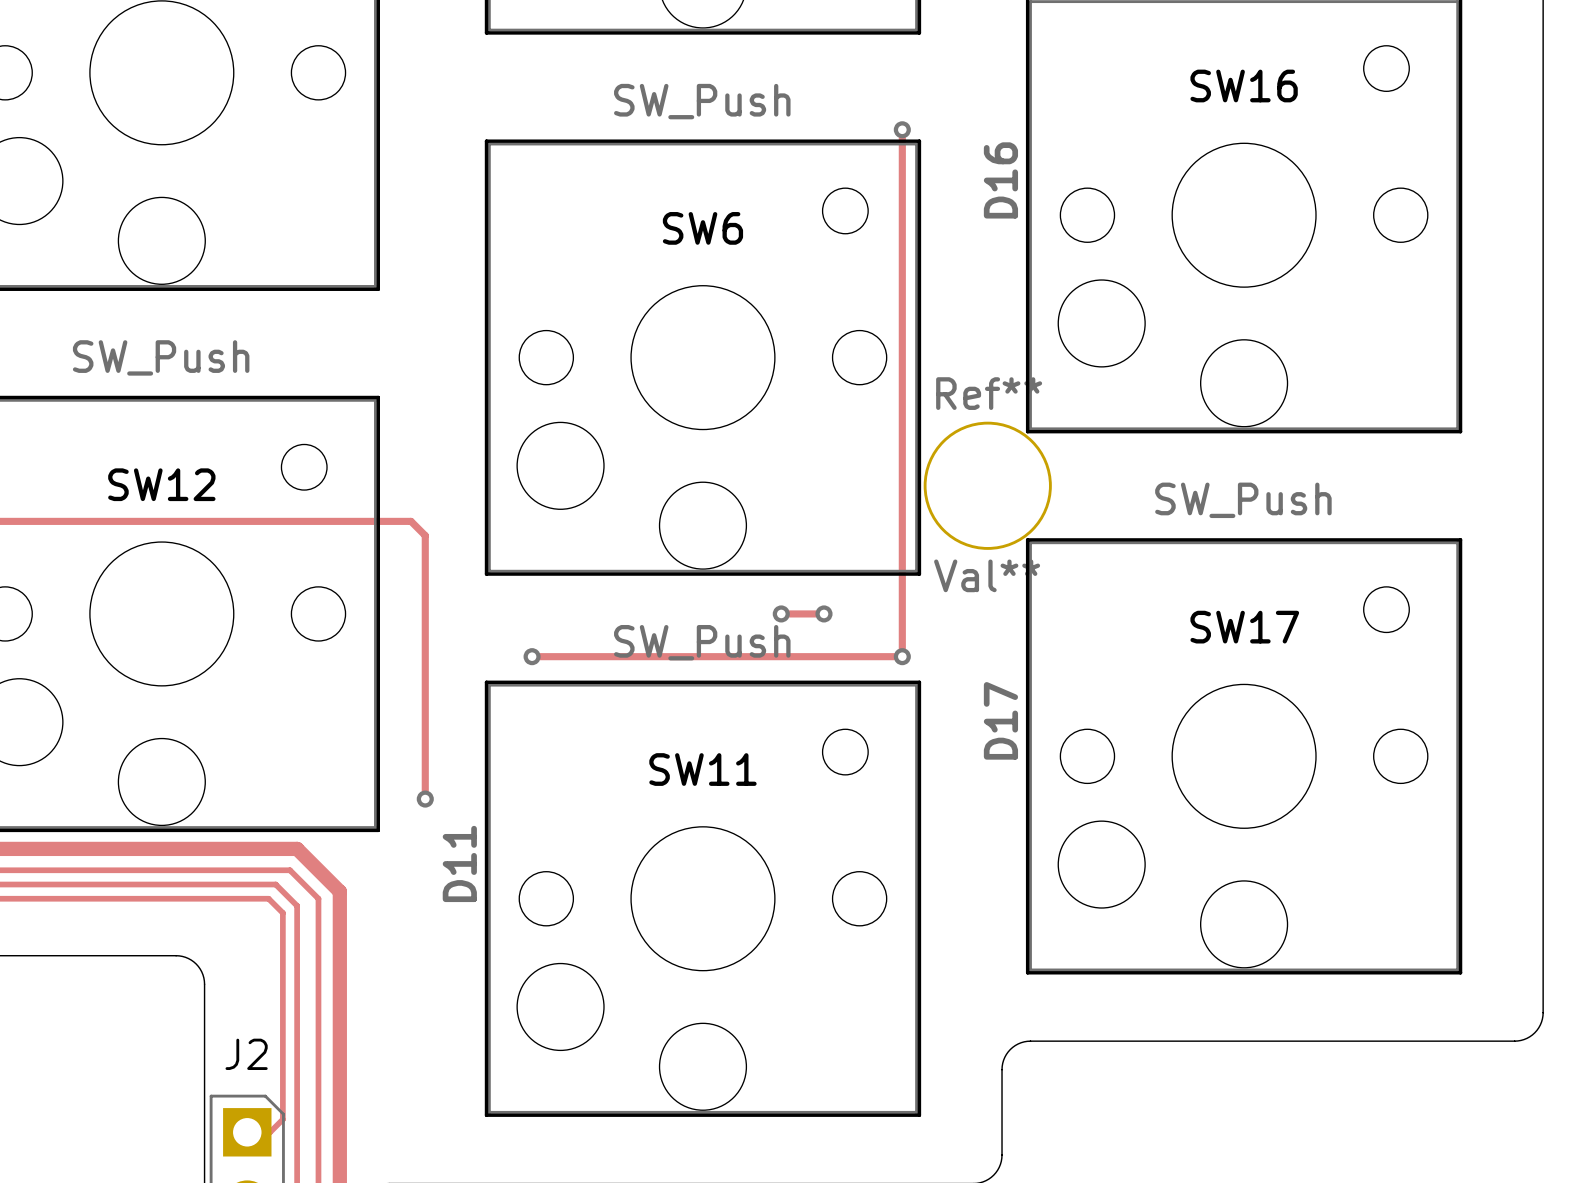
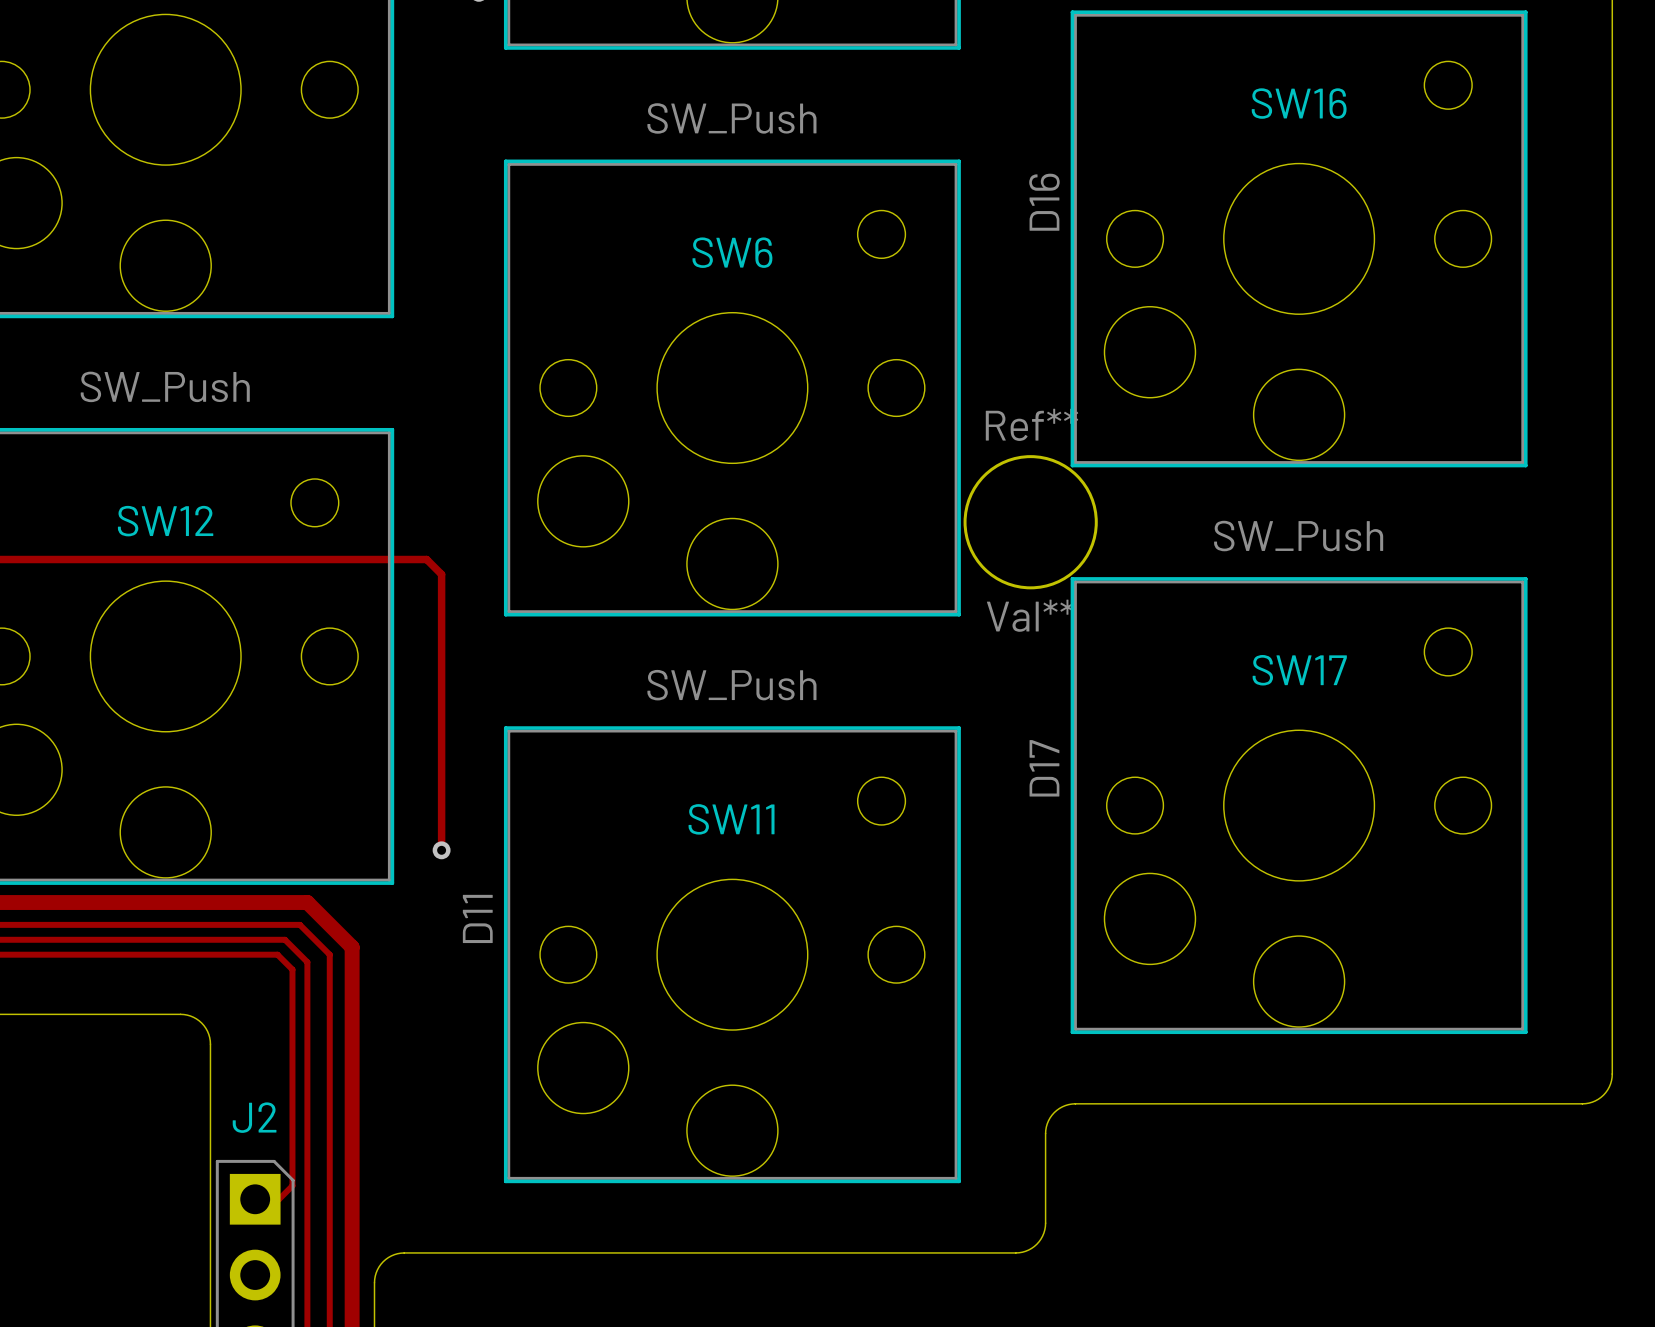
track: (902, 129) (902, 656) (532, 656) -> none
via: (902, 129) -> none
track: (781, 613) (824, 613) -> none
via: (781, 613) -> none
via: (824, 613) -> none
via: (532, 656) -> none
via: (902, 656) -> none

